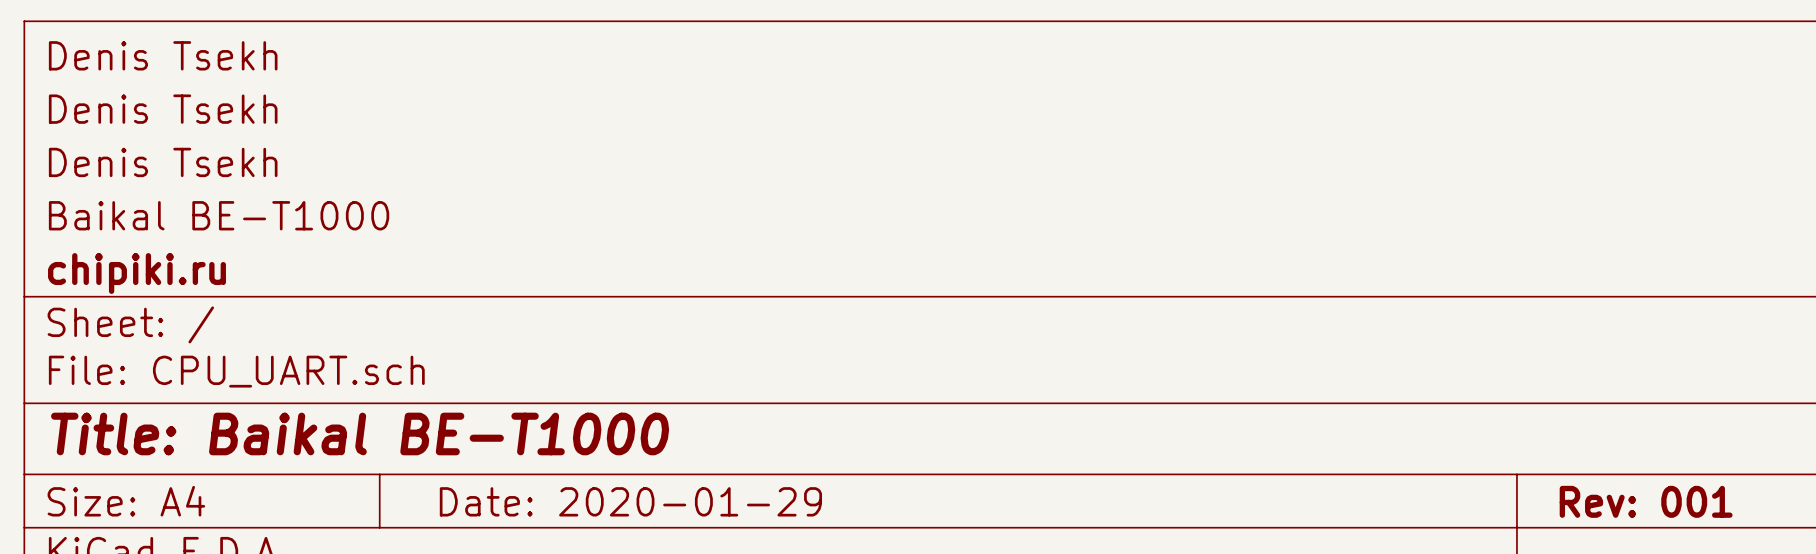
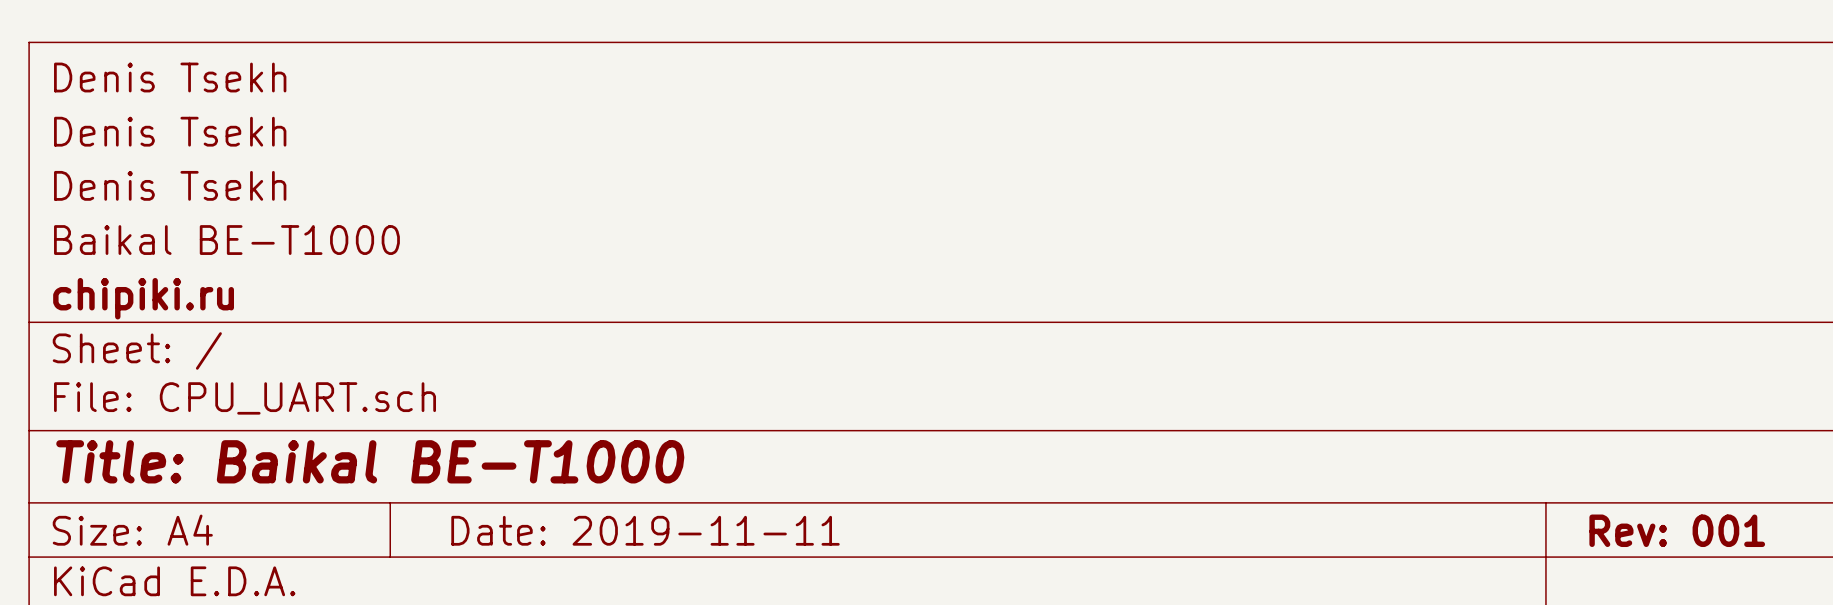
title block: Date: 2020-01-29 (630, 501) -> Date: 2019-11-11 (645, 530)

